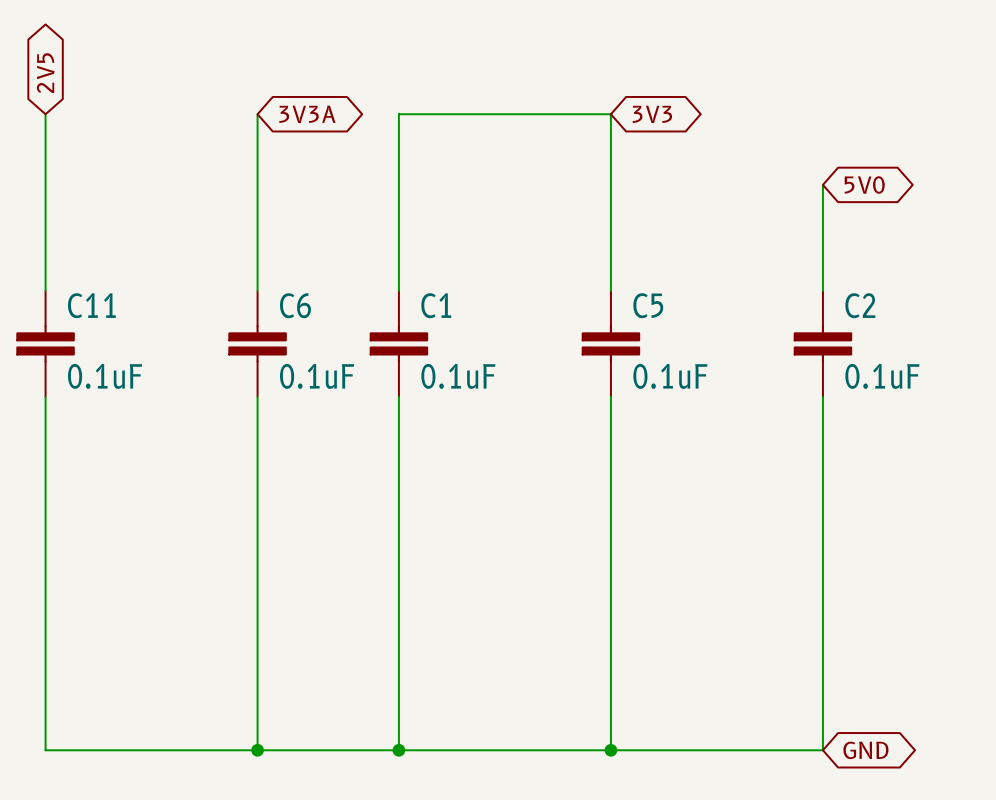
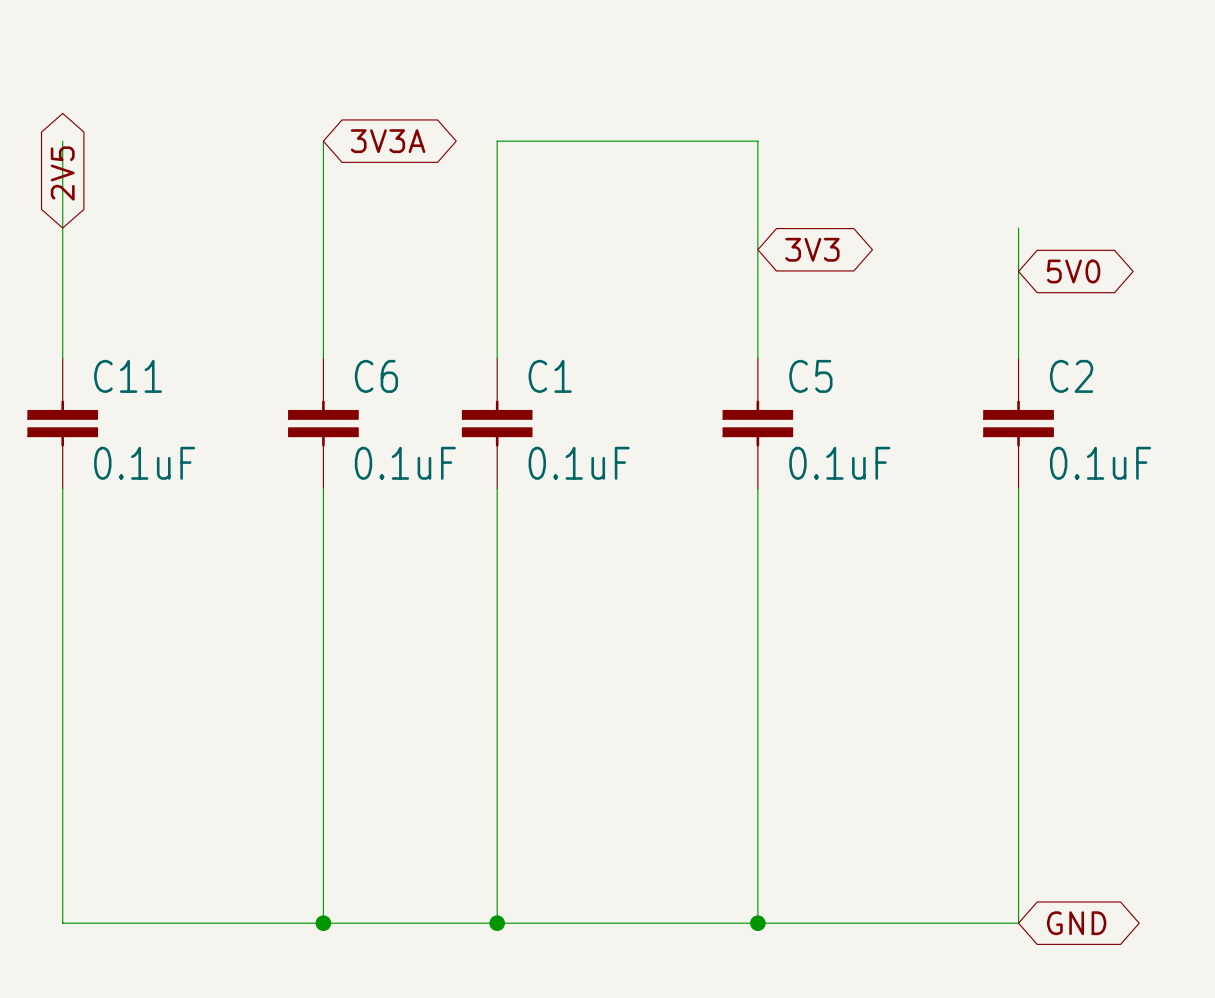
global label position: 2V5 (45, 73) -> 2V5 (62, 173)
global label position: 3V3 (652, 114) -> 3V3 (812, 249)
global label position: 5V0 (864, 185) -> 5V0 (1073, 271)

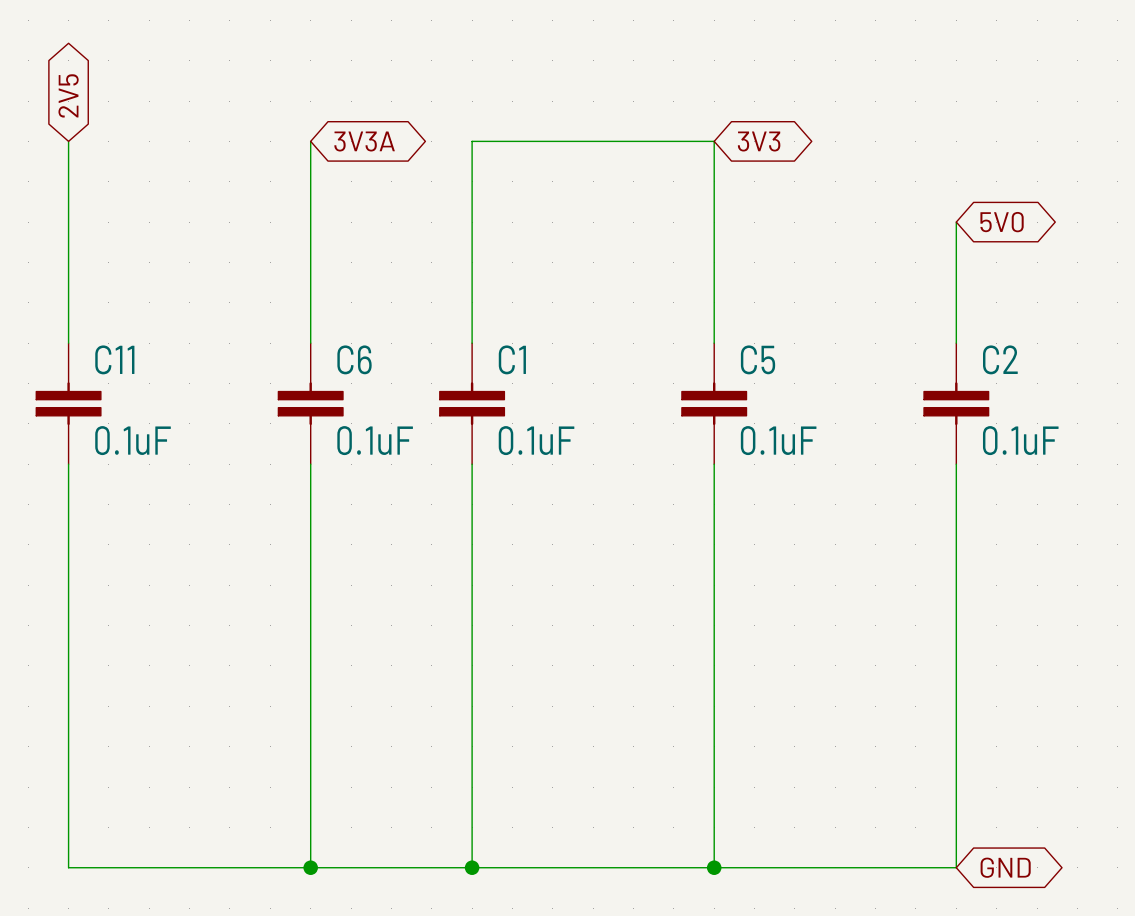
global label position: 2V5 (62, 173) -> 2V5 (68, 95)
global label position: 3V3 (812, 249) -> 3V3 (759, 141)
global label position: 5V0 (1073, 271) -> 5V0 (1002, 222)

